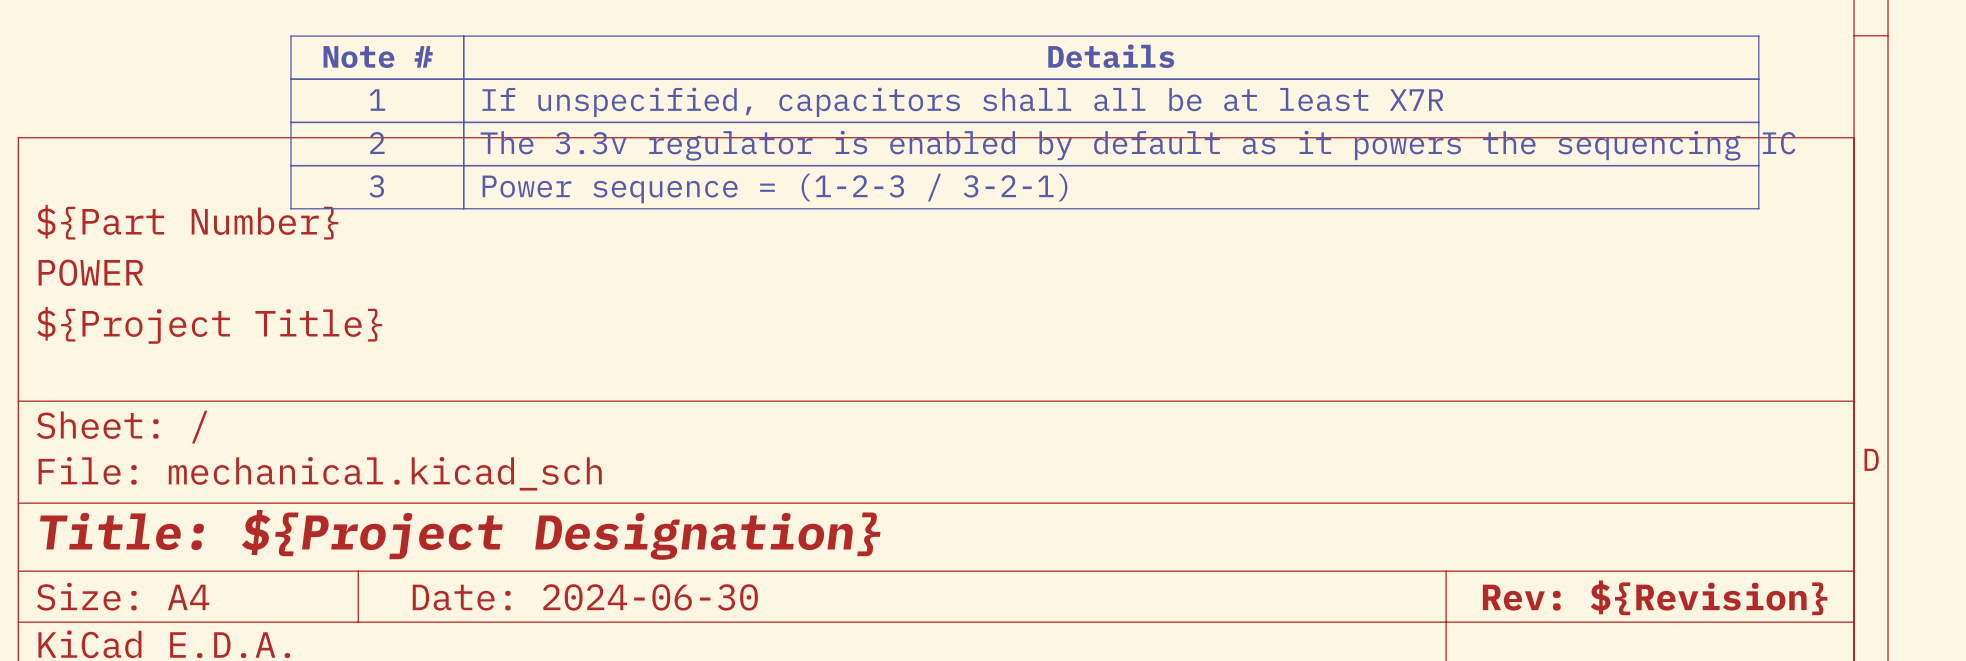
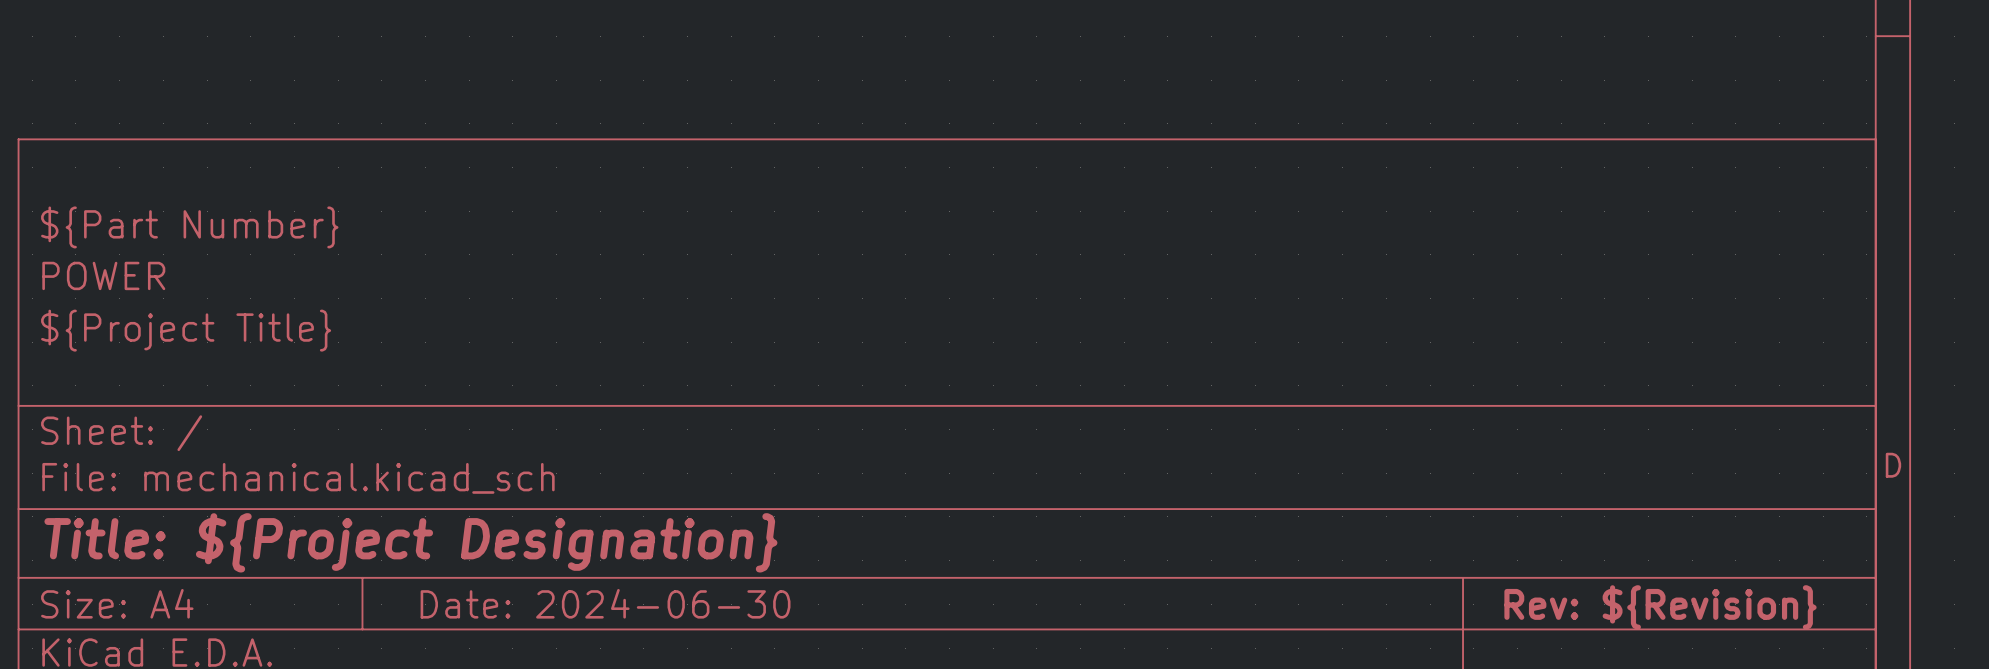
line: (290, 36) (290, 208) (1758, 208) (1758, 36) (290, 36) -> none
line: (463, 36) (463, 208) -> none
text: Details (1111, 56) -> none
text: Note # (378, 57) -> none
line: (290, 79) (1758, 79) -> none
text: 1 (377, 100) -> none
text: If unspecified, capacitors shall all be at least X7R (962, 102) -> none
line: (290, 122) (1758, 122) -> none
text: 2 (377, 143) -> none
text: The 3.3v regulator is enabled by default as it powers the sequencing IC (1138, 145) -> none
line: (290, 165) (1758, 165) -> none
text: 3 (376, 186) -> none
text: Power sequence = (1-2-3 / 3-2-1) (774, 188) -> none

